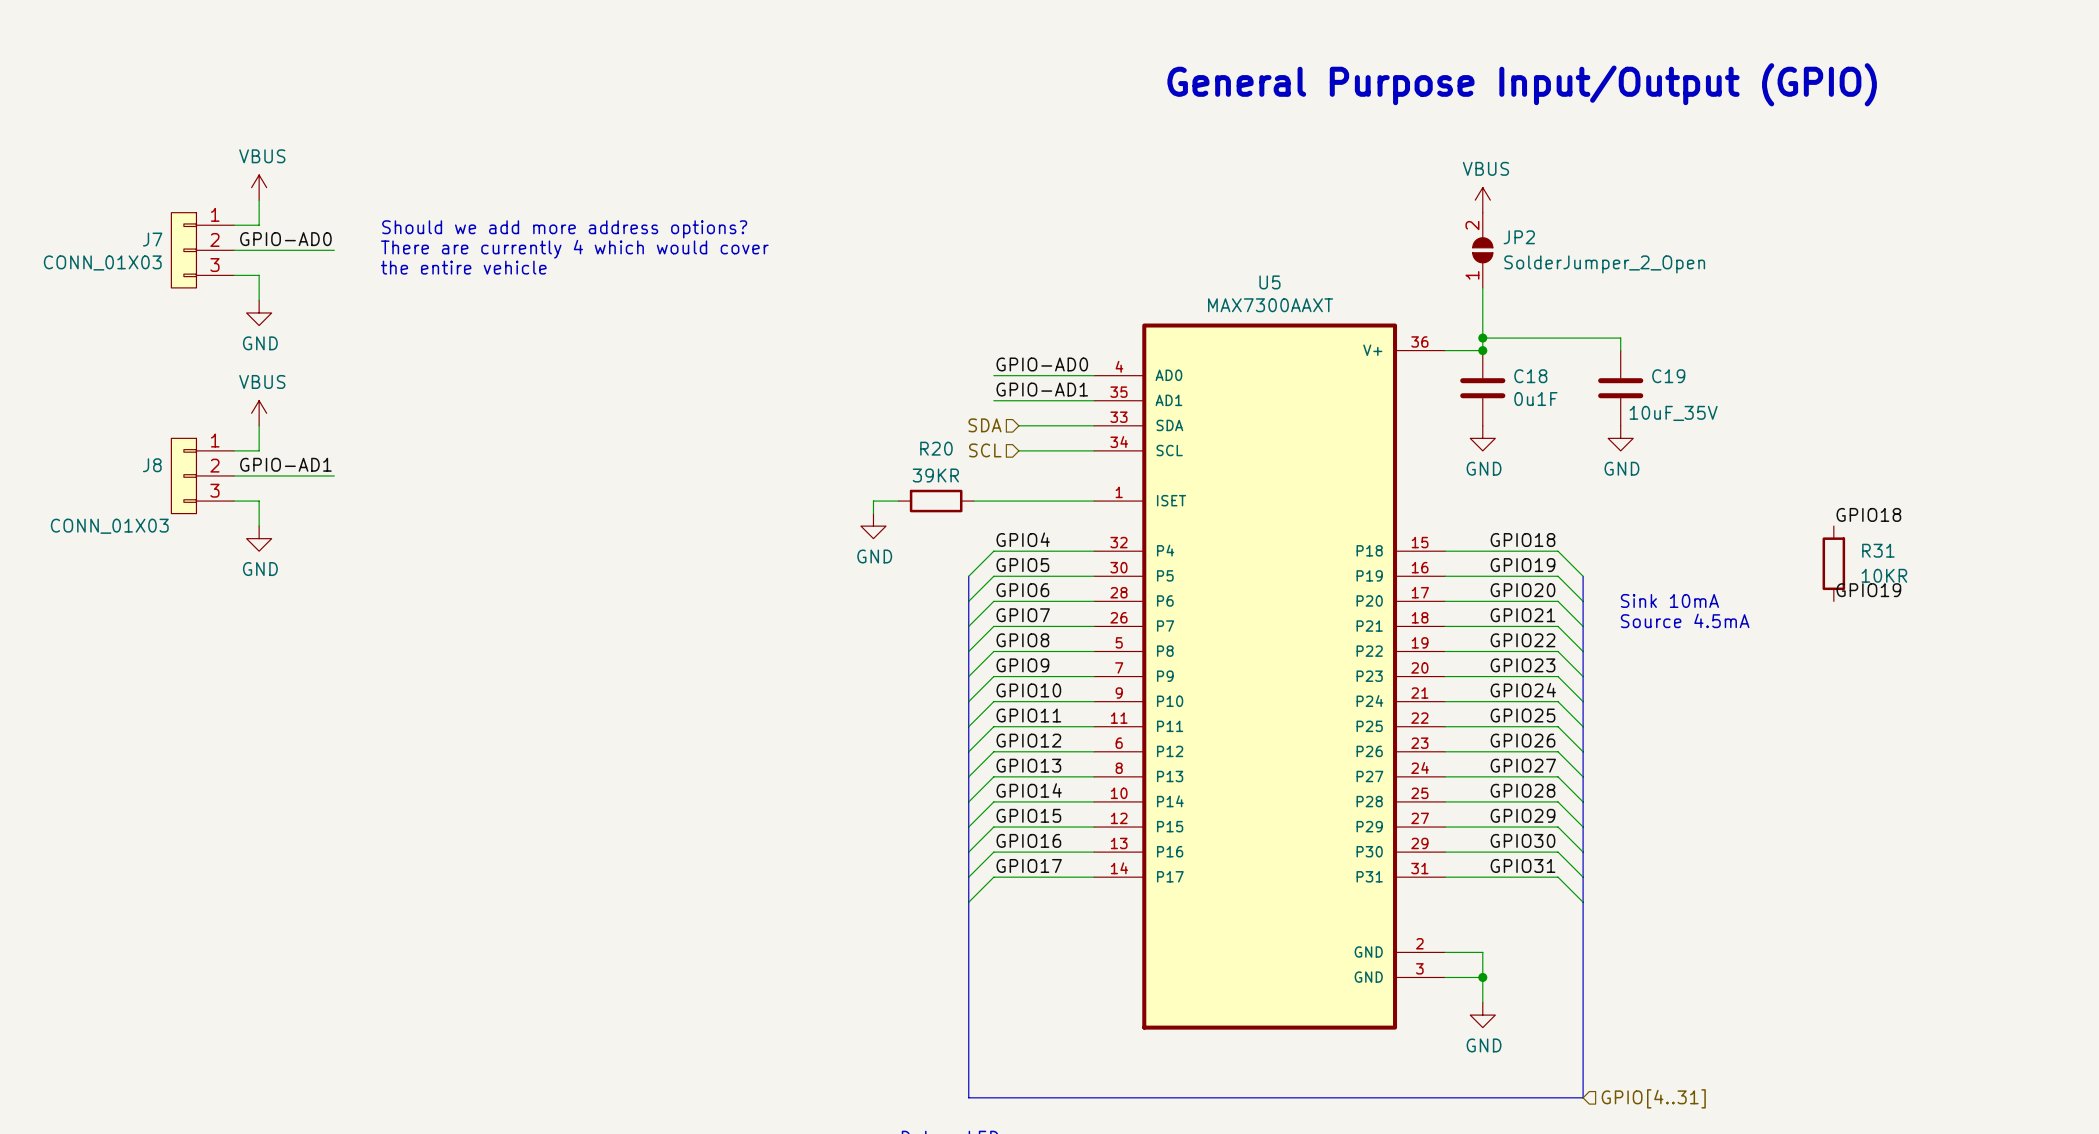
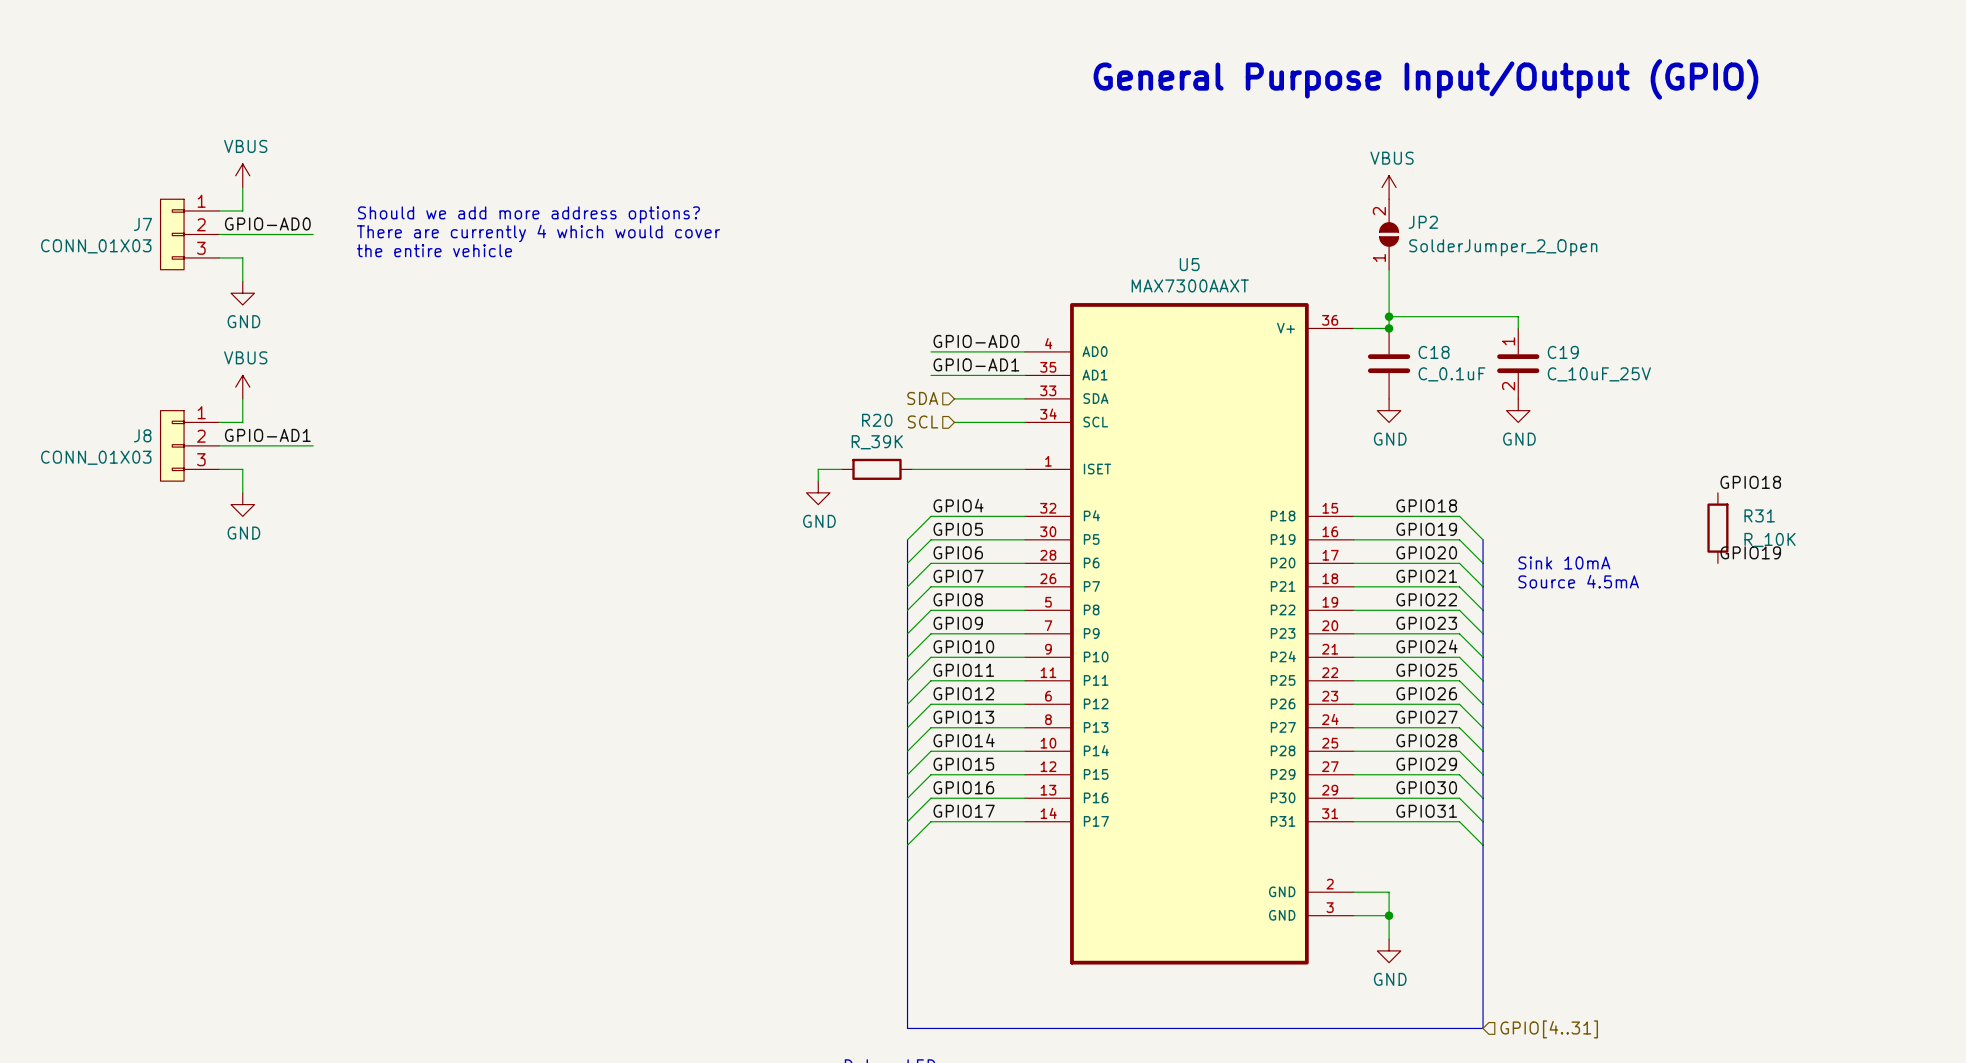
C19 pin number: none -> 1 (1508, 341)
C18 value: 0u1F (1535, 399) -> C_0.1uF (1451, 374)
C19 pin number: none -> 2 (1508, 386)
C19 value: 10uF_35V (1673, 413) -> C_10uF_25V (1599, 374)
R20 value: 39KR (935, 475) -> R_39K (877, 442)
J8 value position: CONN_01X03 (109, 526) -> CONN_01X03 (96, 457)
R31 value: 10KR (1884, 575) -> R_10K (1770, 539)

